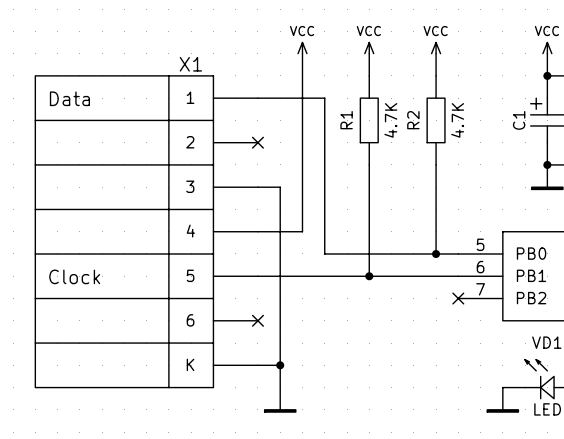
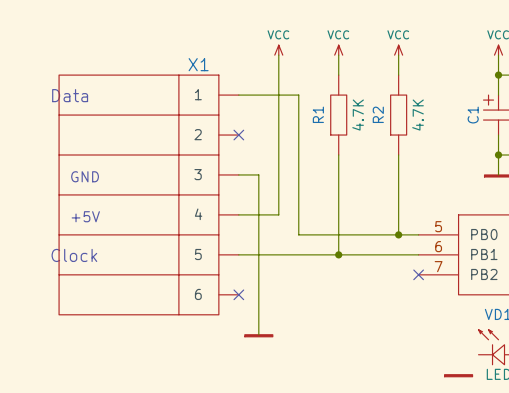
X1 name position: X1 (190, 64) -> X1 (198, 64)
X1 symbol: [35, 75, 258, 388] -> [59, 75, 239, 315]
text: none -> GND (85, 176)
text: none -> +5V (85, 216)
wire: (257, 365) (280, 365) (280, 409) -> none
junction: (280, 365) -> none
wire: (525, 387) (502, 387) (502, 409) -> none
power symbol position: (280, 410) -> (258, 335)

